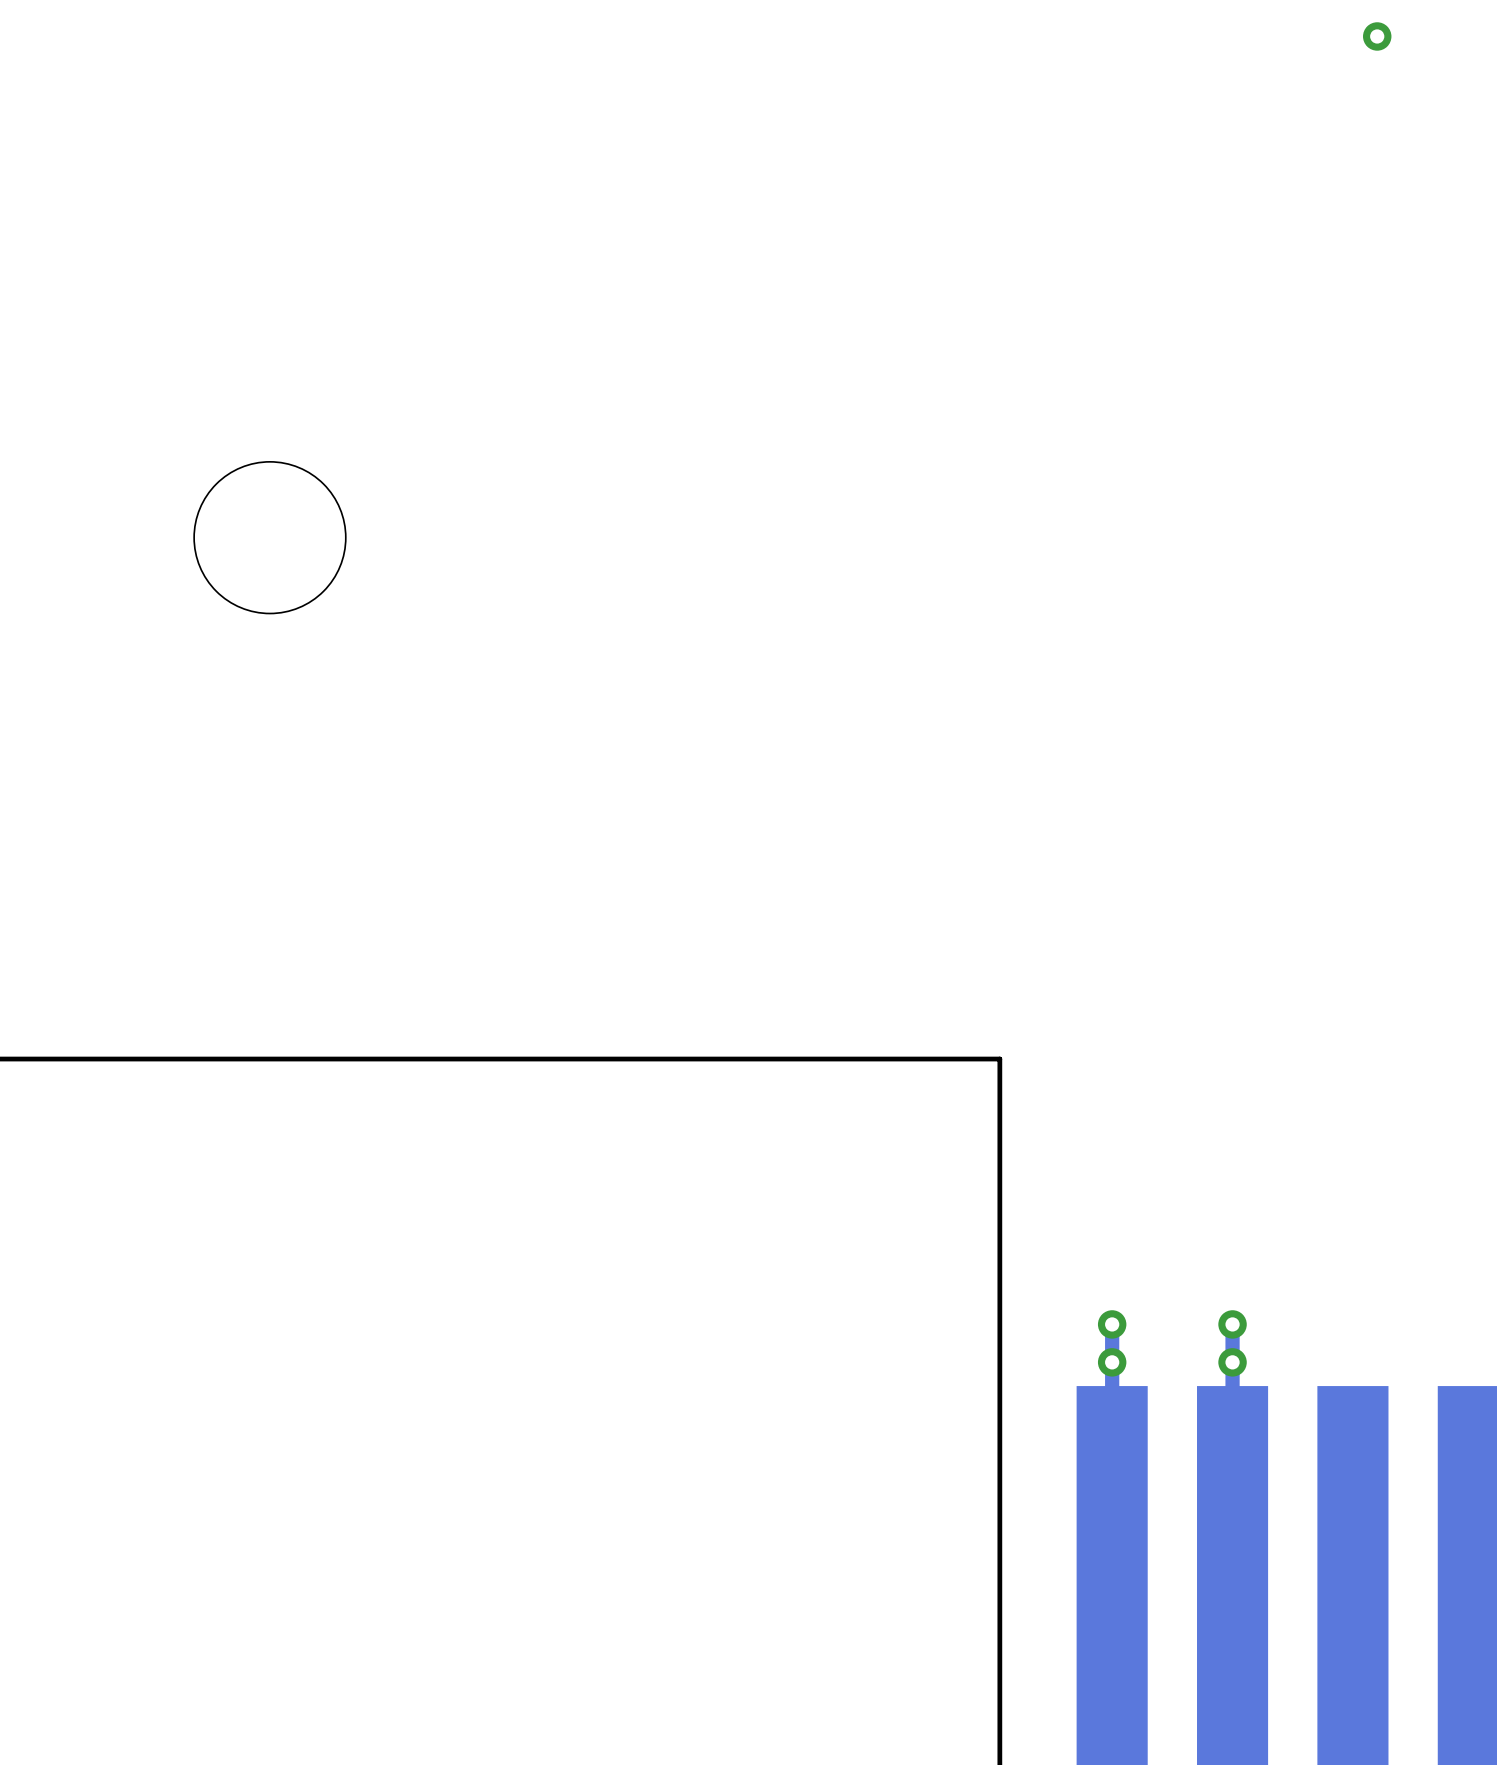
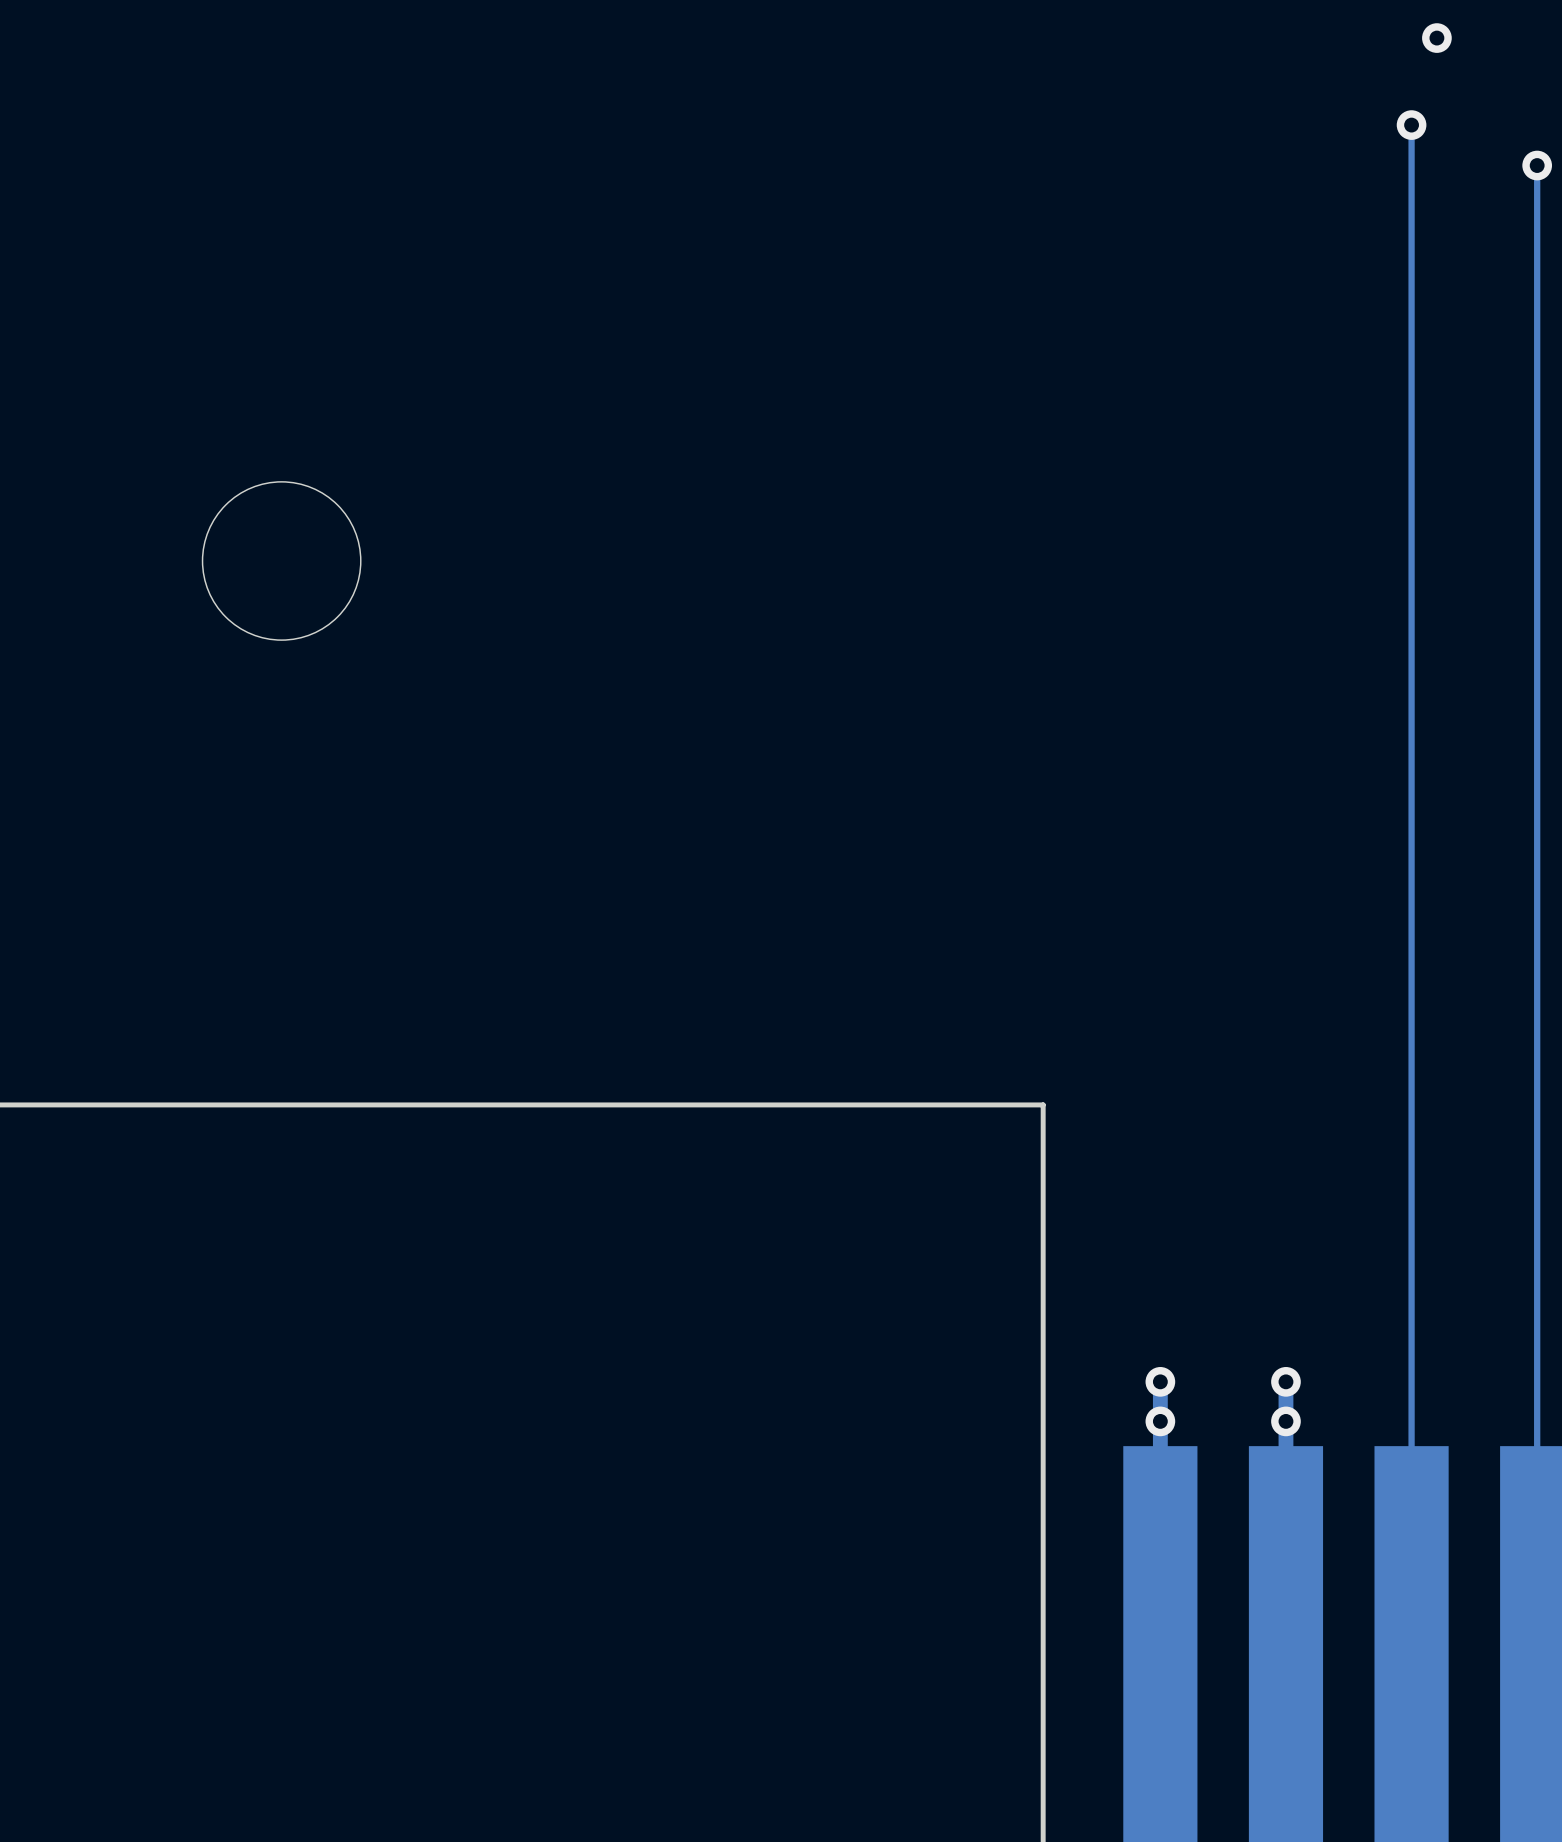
track: none -> (1411, 125) (1411, 1693)
via: none -> (1411, 125)
track: none -> (1537, 165) (1537, 1693)
via: none -> (1537, 165)

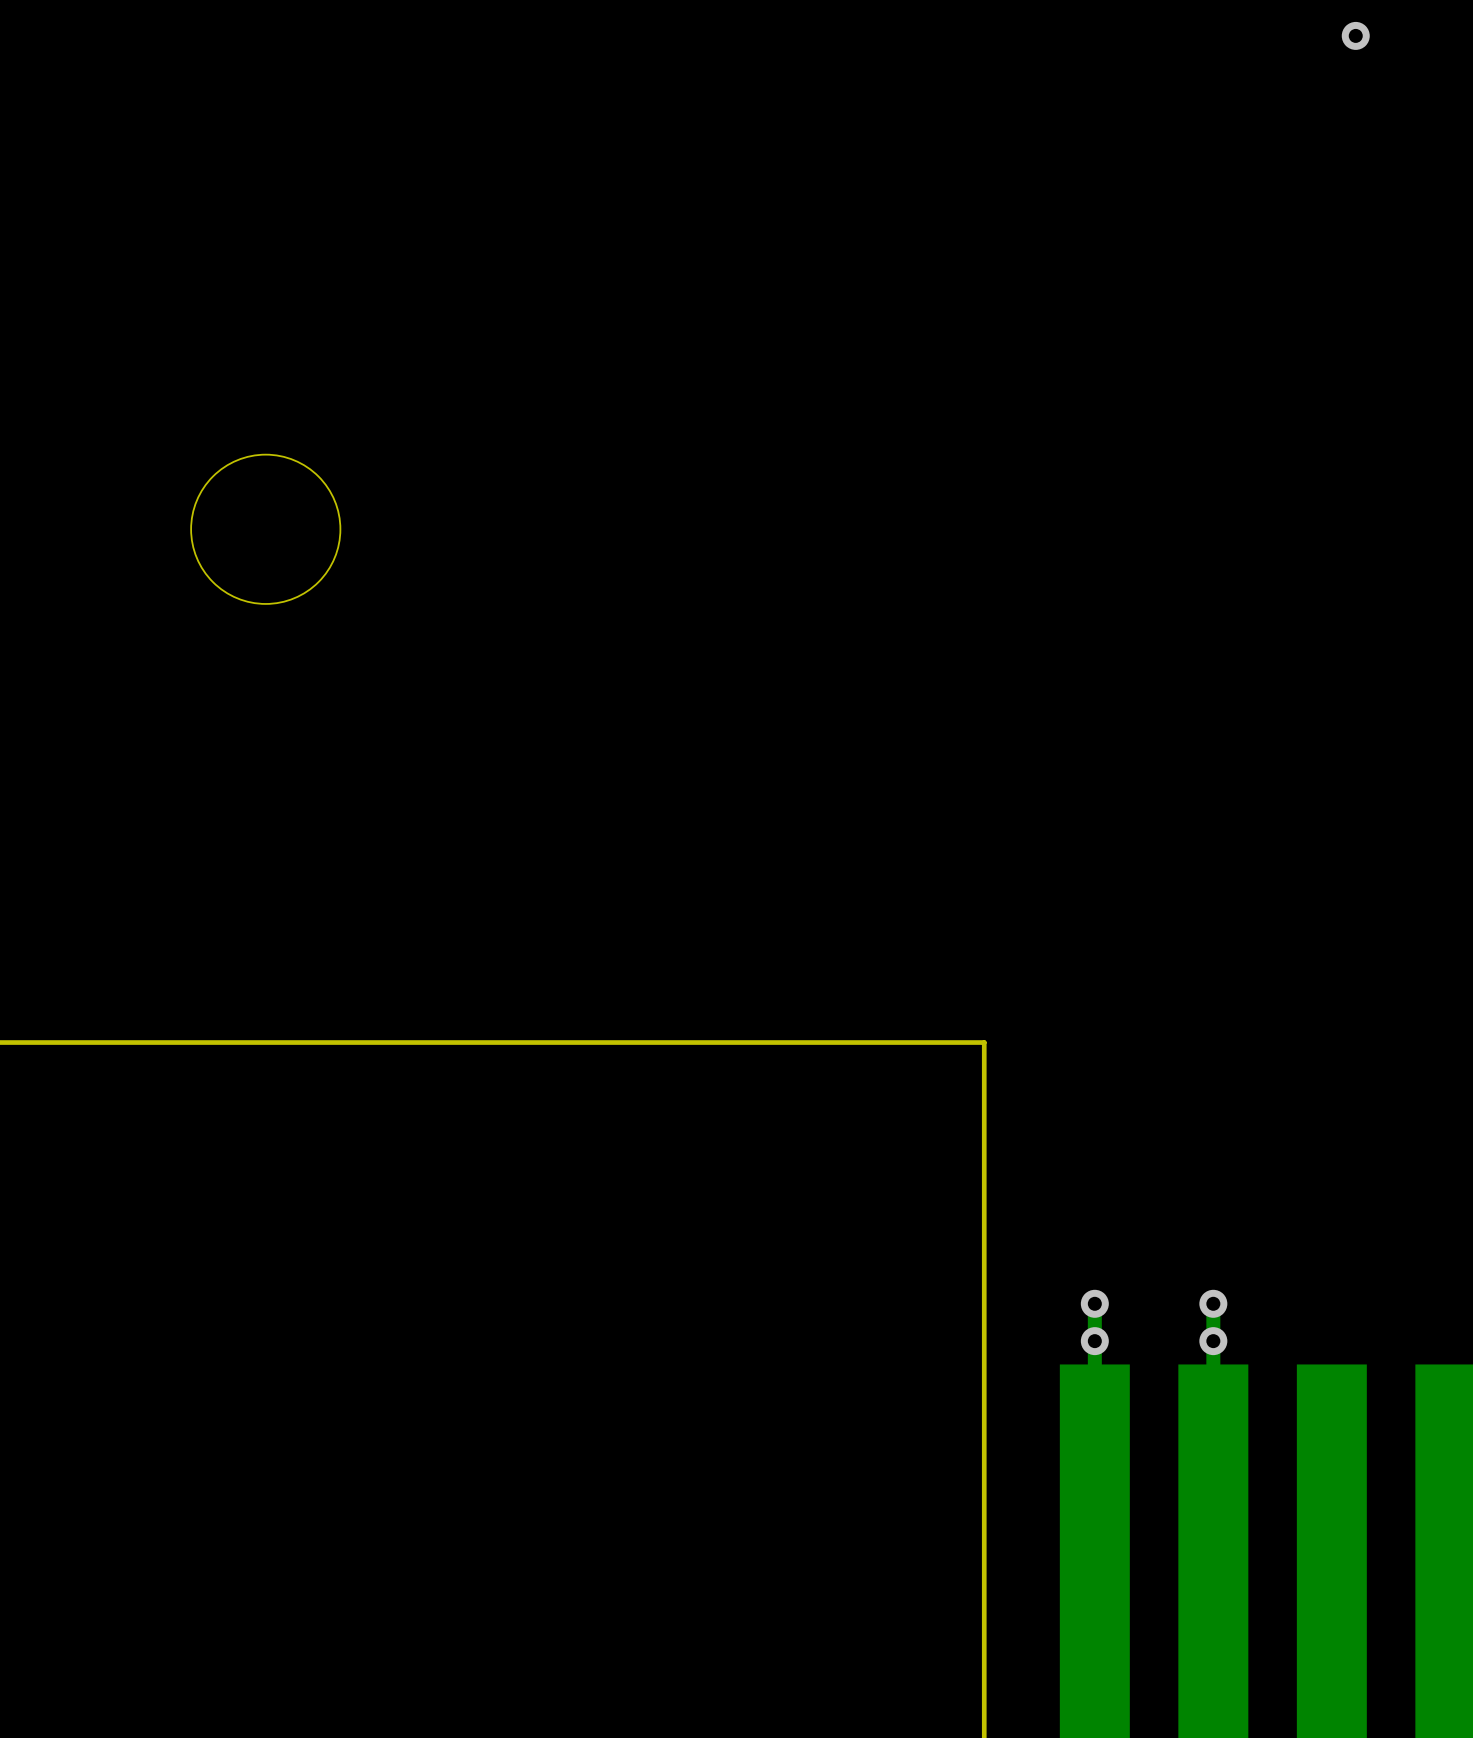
track: (1411, 125) (1411, 1693) -> none
via: (1411, 125) -> none
track: (1537, 165) (1537, 1693) -> none
via: (1537, 165) -> none

